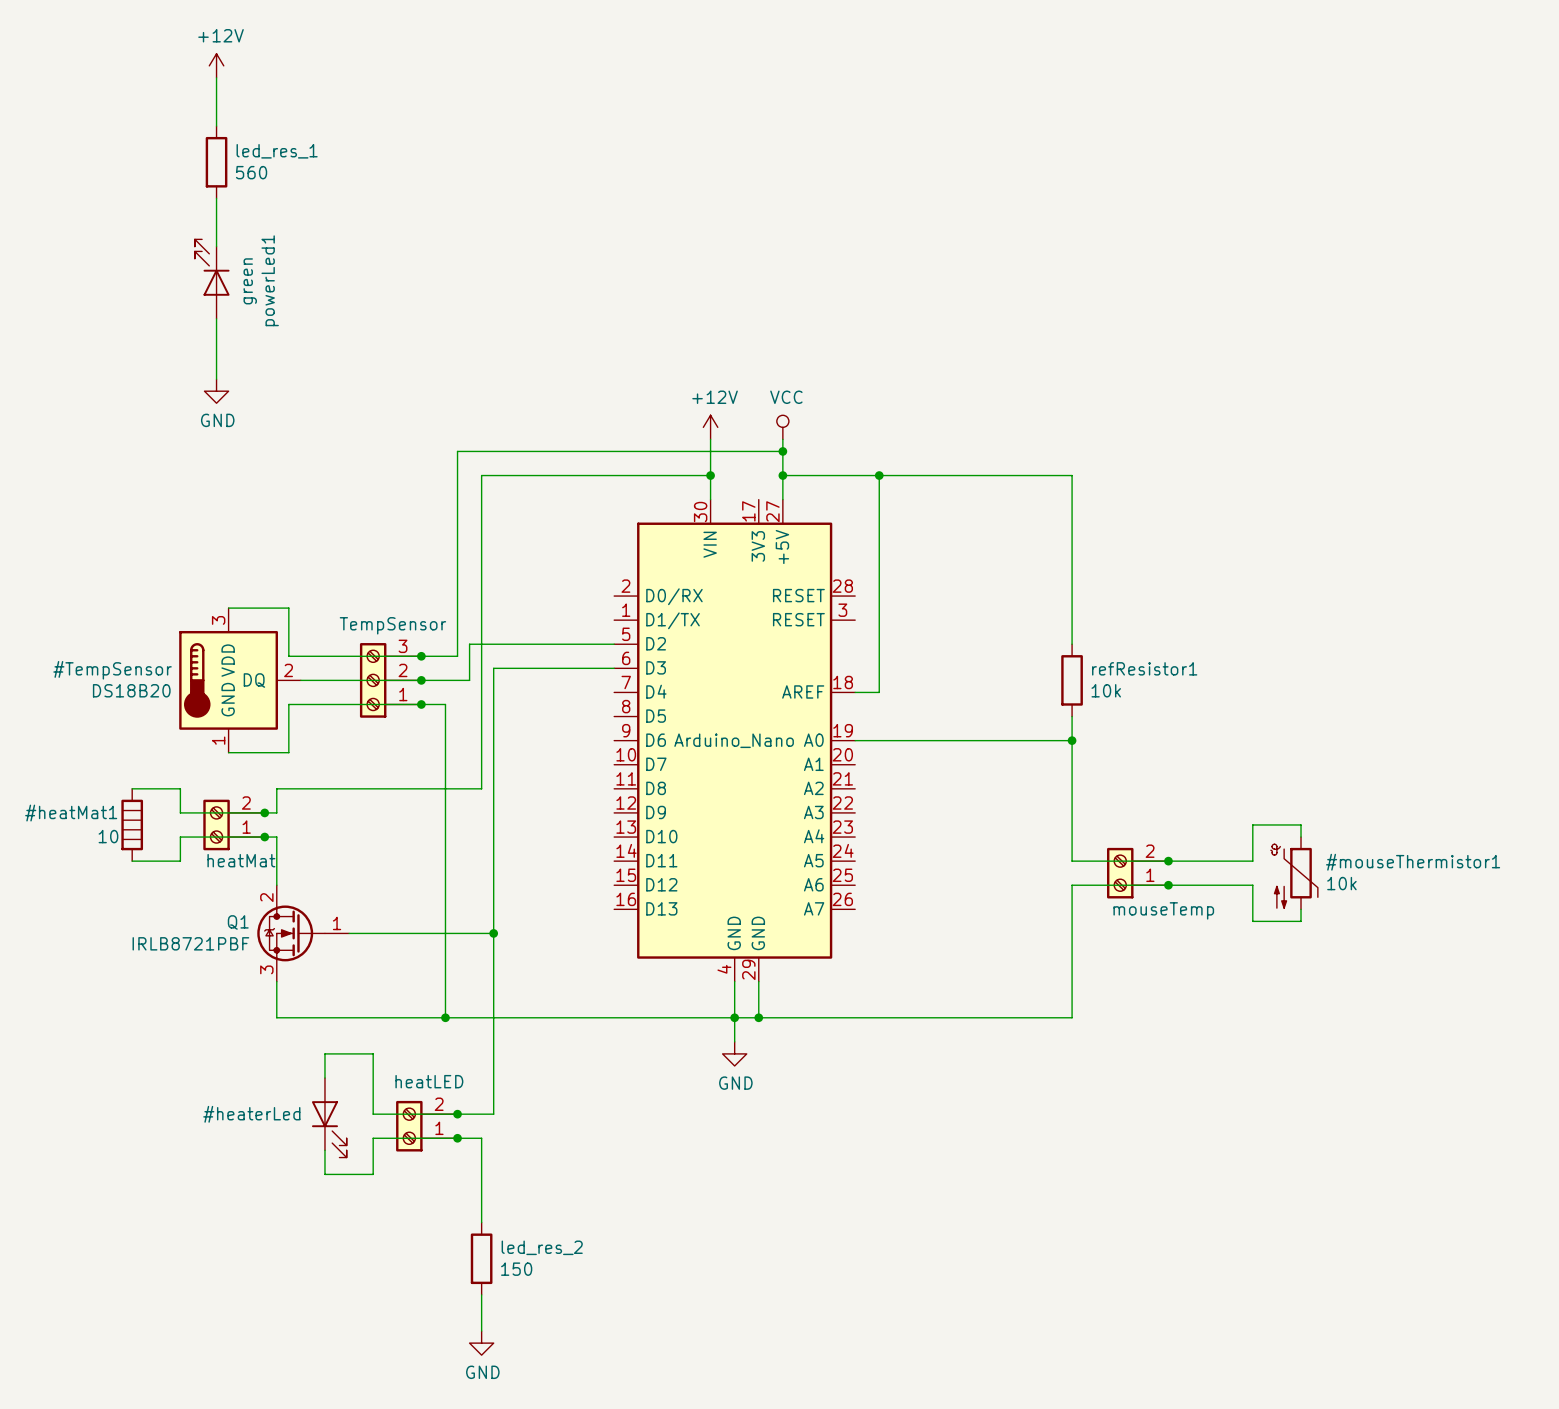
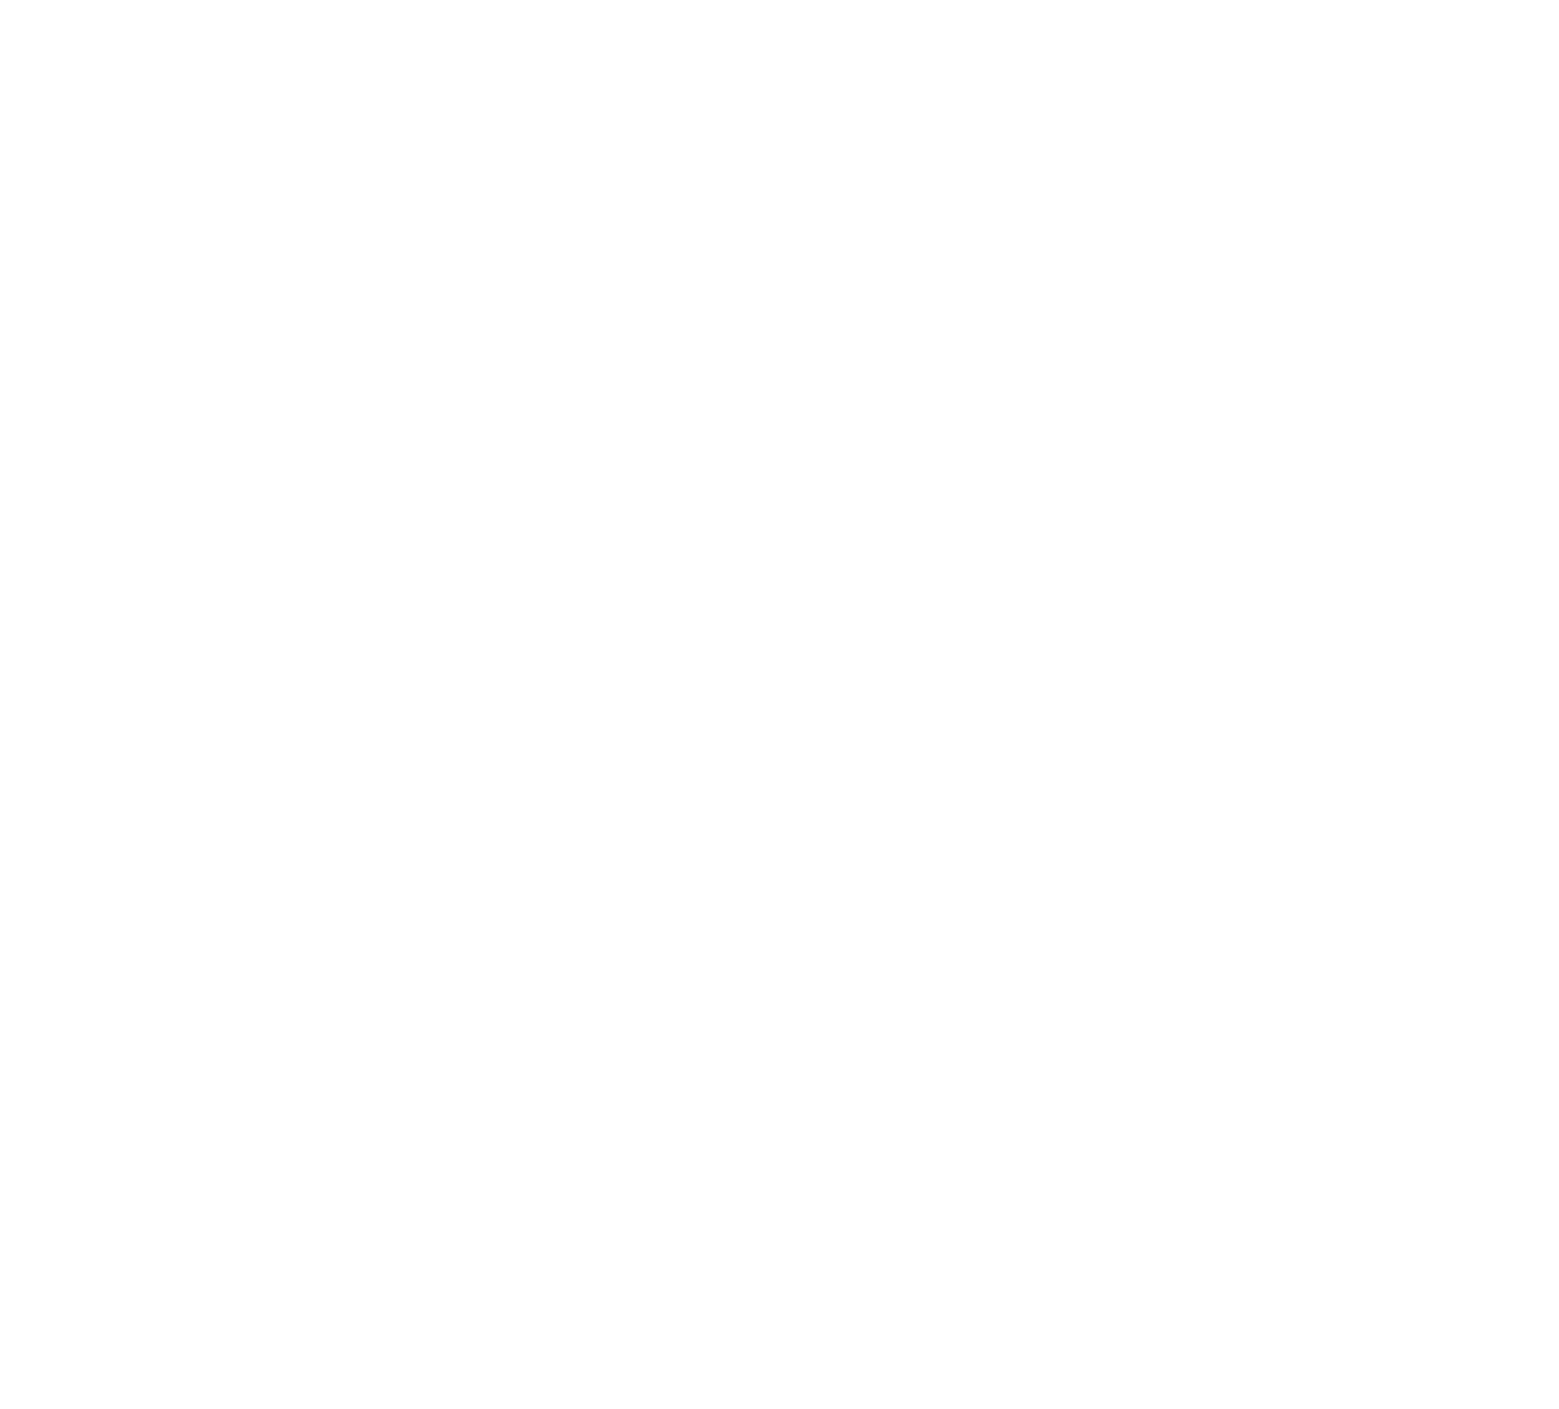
power symbol: +12V (216, 65) -> none
wire: (216, 77) (216, 126) -> none
led_res_1: 560 (216, 162) -> none
wire: (216, 198) (216, 246) -> none
powerLed1: green (212, 279) -> none
wire: (216, 318) (216, 379) -> none
power symbol: GND (216, 391) -> none
power symbol: +12V (710, 427) -> none
power symbol: VCC (782, 427) -> none
wire: (710, 439) (710, 499) -> none
wire: (782, 439) (782, 499) -> none
wire: (782, 451) (457, 451) (457, 656) (288, 656) (288, 608) (228, 608) -> none
junction: (782, 451) -> none
wire: (710, 475) (481, 475) (481, 788) (276, 788) (276, 812) (180, 812) (180, 788) (132, 788) -> none
junction: (710, 475) -> none
wire: (782, 475) (1072, 475) (1072, 644) -> none
junction: (782, 475) -> none
wire: (879, 475) (879, 692) (855, 692) -> none
junction: (879, 475) -> none
wire: (614, 644) (469, 644) (469, 680) (300, 680) -> none
junction: (421, 656) -> none
wire: (614, 668) (493, 668) (493, 1114) (373, 1114) (373, 1053) (324, 1053) (324, 1078) -> none
#TempSensor: DS18B20 (240, 680) -> none
part: TempSensor (390, 680) -> none
junction: (421, 680) -> none
refResistor1: 10k (1072, 680) -> none
junction: (421, 704) -> none
wire: (1072, 716) (1072, 861) (1252, 861) (1252, 824) (1301, 824) (1301, 837) -> none
part: Arduino_Nano (734, 740) -> none
wire: (855, 740) (1072, 740) -> none
junction: (1072, 740) -> none
wire: (228, 752) (288, 752) (288, 704) (445, 704) (445, 1017) -> none
junction: (264, 812) -> none
#heatMat1: 10 (132, 824) -> none
heatMat: (234, 824) -> none
junction: (264, 837) -> none
wire: (132, 861) (180, 861) (180, 837) (276, 837) (276, 885) -> none
junction: (1168, 861) -> none
mouseTemp: (1137, 873) -> none
#mouseThermistor1: 10k (1294, 873) -> none
junction: (1168, 885) -> none
wire: (1301, 909) (1301, 921) (1252, 921) (1252, 885) (1072, 885) (1072, 1017) (276, 1017) (276, 981) -> none
Q1: IRLB8721PBF (303, 933) -> none
wire: (349, 933) (493, 933) -> none
junction: (493, 933) -> none
wire: (734, 981) (734, 1041) -> none
wire: (758, 981) (758, 1017) -> none
junction: (445, 1017) -> none
junction: (734, 1017) -> none
junction: (758, 1017) -> none
power symbol: GND (734, 1053) -> none
junction: (457, 1114) -> none
#heaterLed: (329, 1117) -> none
part: heatLED (426, 1126) -> none
junction: (457, 1138) -> none
wire: (324, 1150) (324, 1174) (373, 1174) (373, 1138) (481, 1138) (481, 1222) -> none
led_res_2: 150 (481, 1258) -> none
wire: (481, 1294) (481, 1331) -> none
power symbol: GND (481, 1343) -> none

